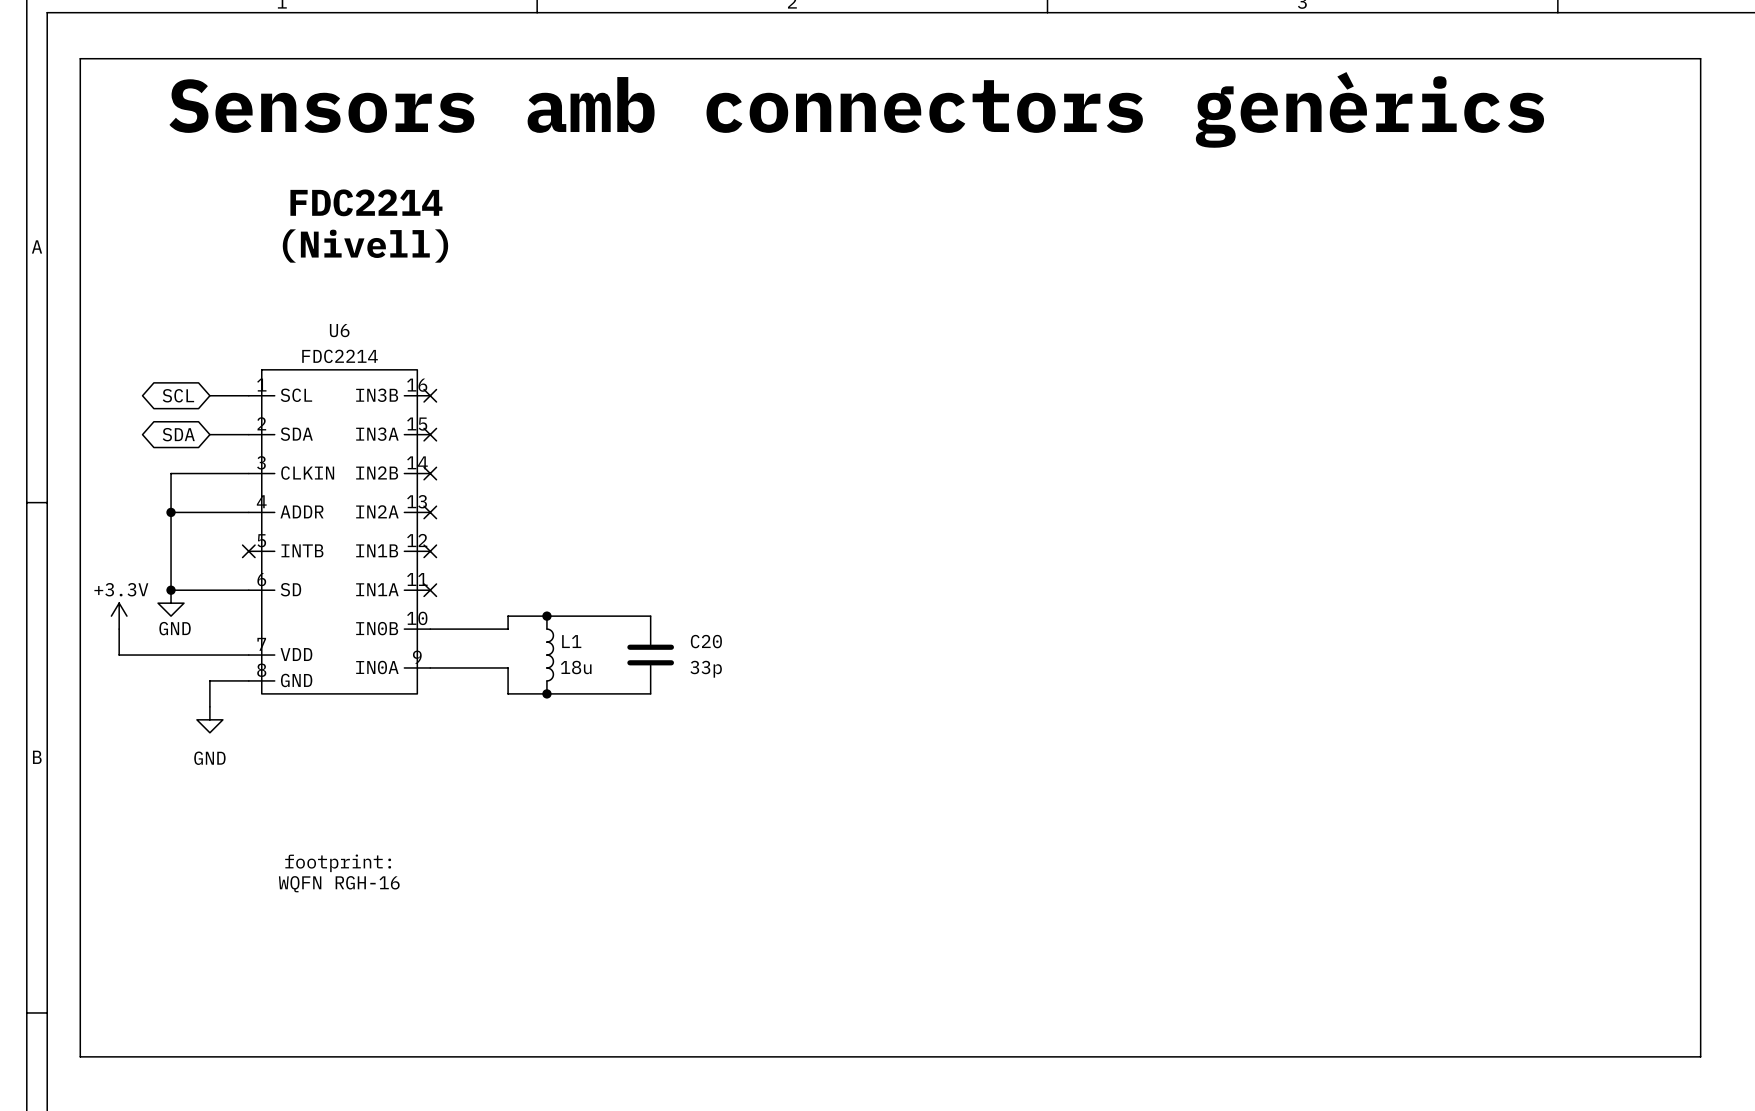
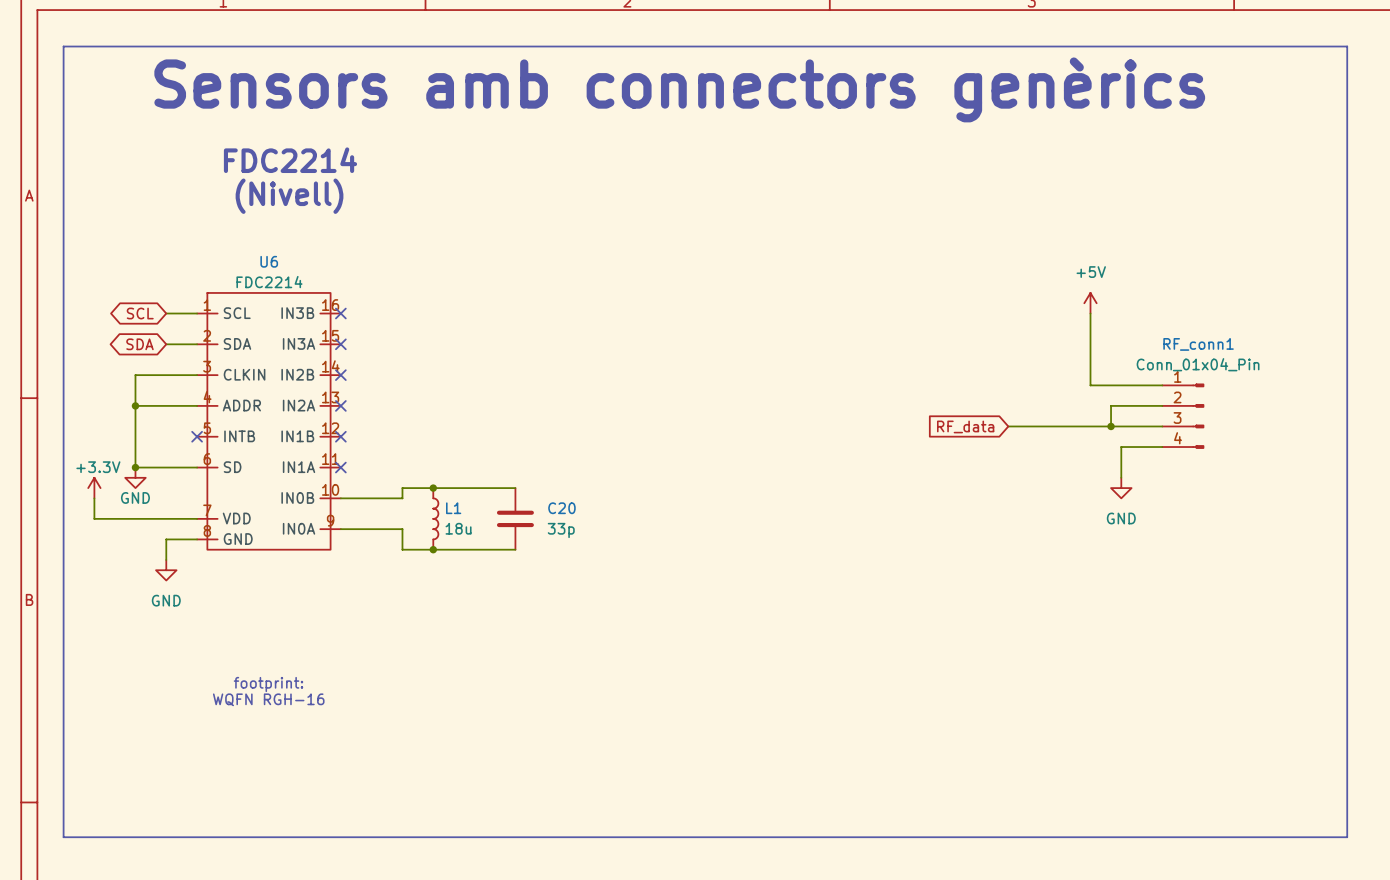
power symbol: none -> +5V (1090, 303)
wire: none -> (1090, 313) (1090, 385) (1162, 385)
wire: none -> (1162, 405) (1111, 405) (1111, 426)
RF_conn1: none -> Conn_01x04_Pin (1183, 416)
wire: none -> (1008, 426) (1162, 426)
junction: none -> (1111, 426)
global label: none -> RF_data (965, 426)
wire: none -> (1162, 447) (1121, 447) (1121, 477)
power symbol: none -> GND (1121, 488)

